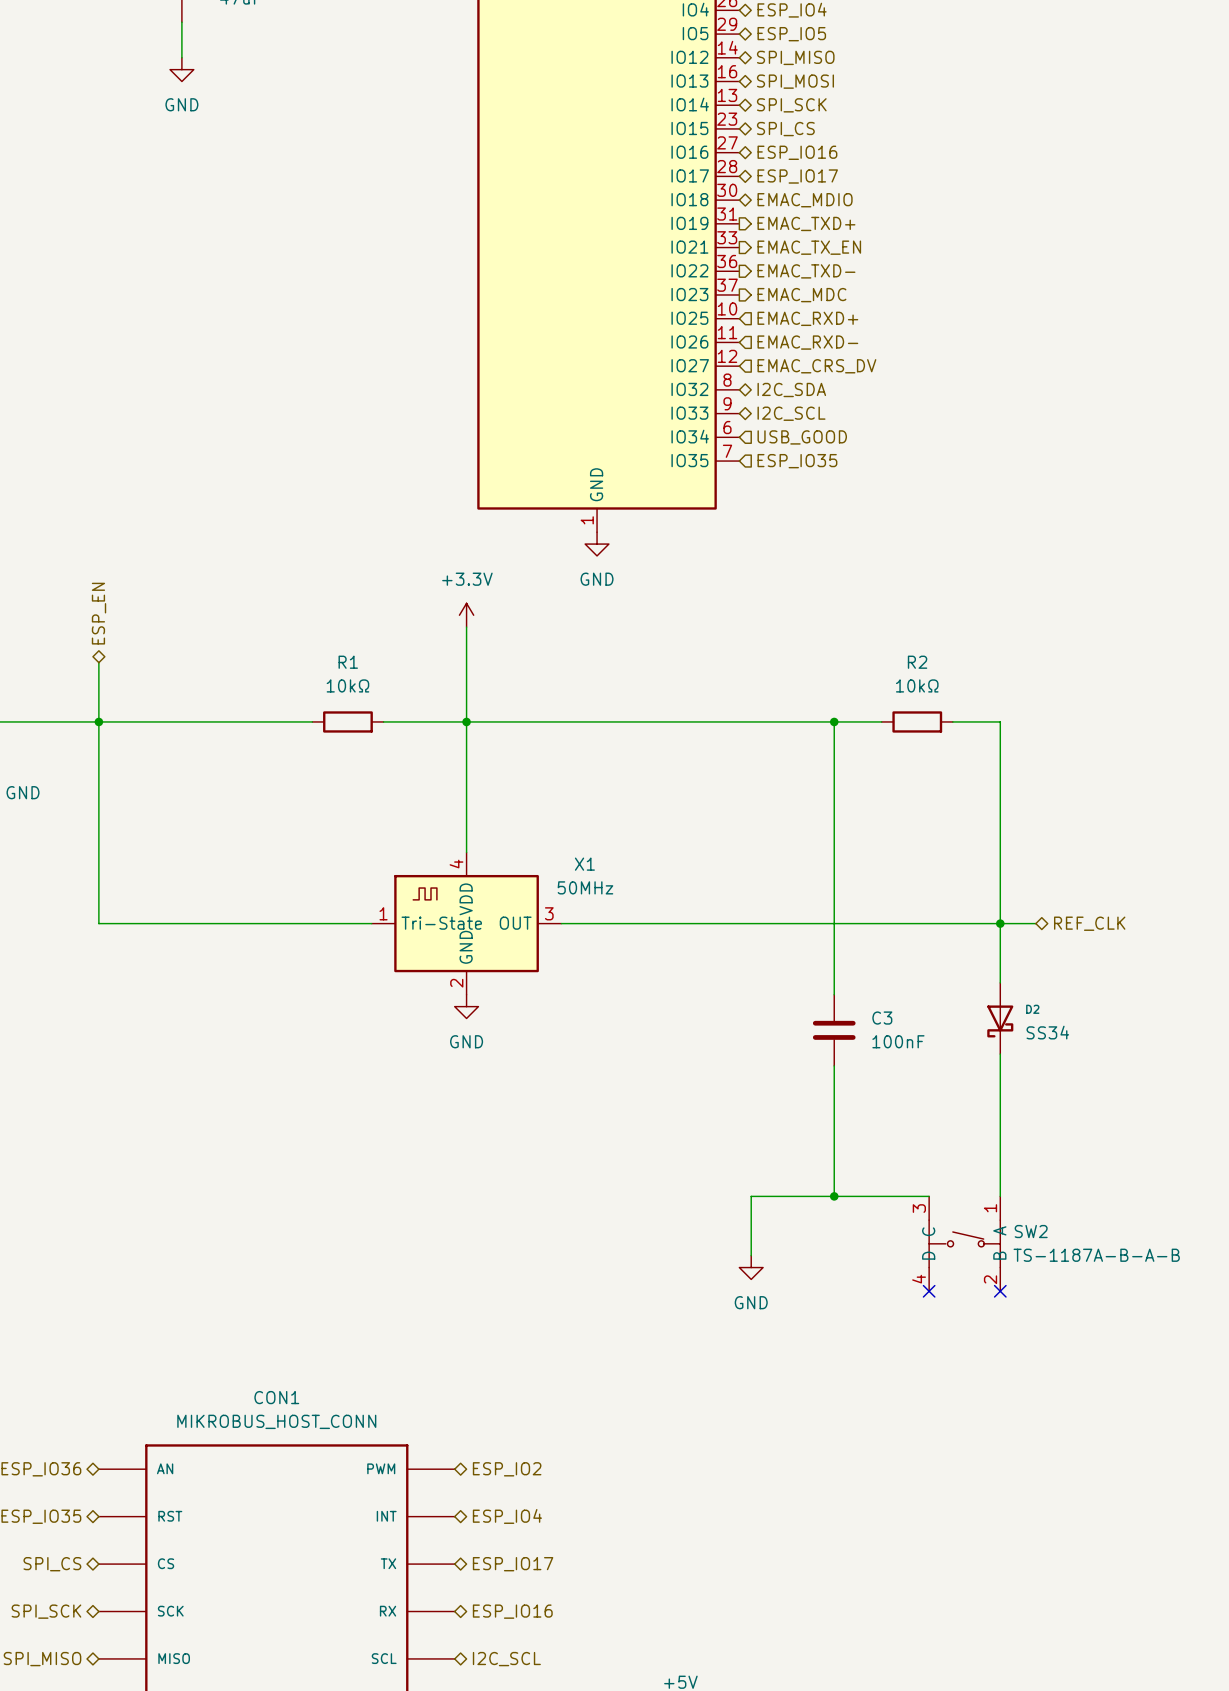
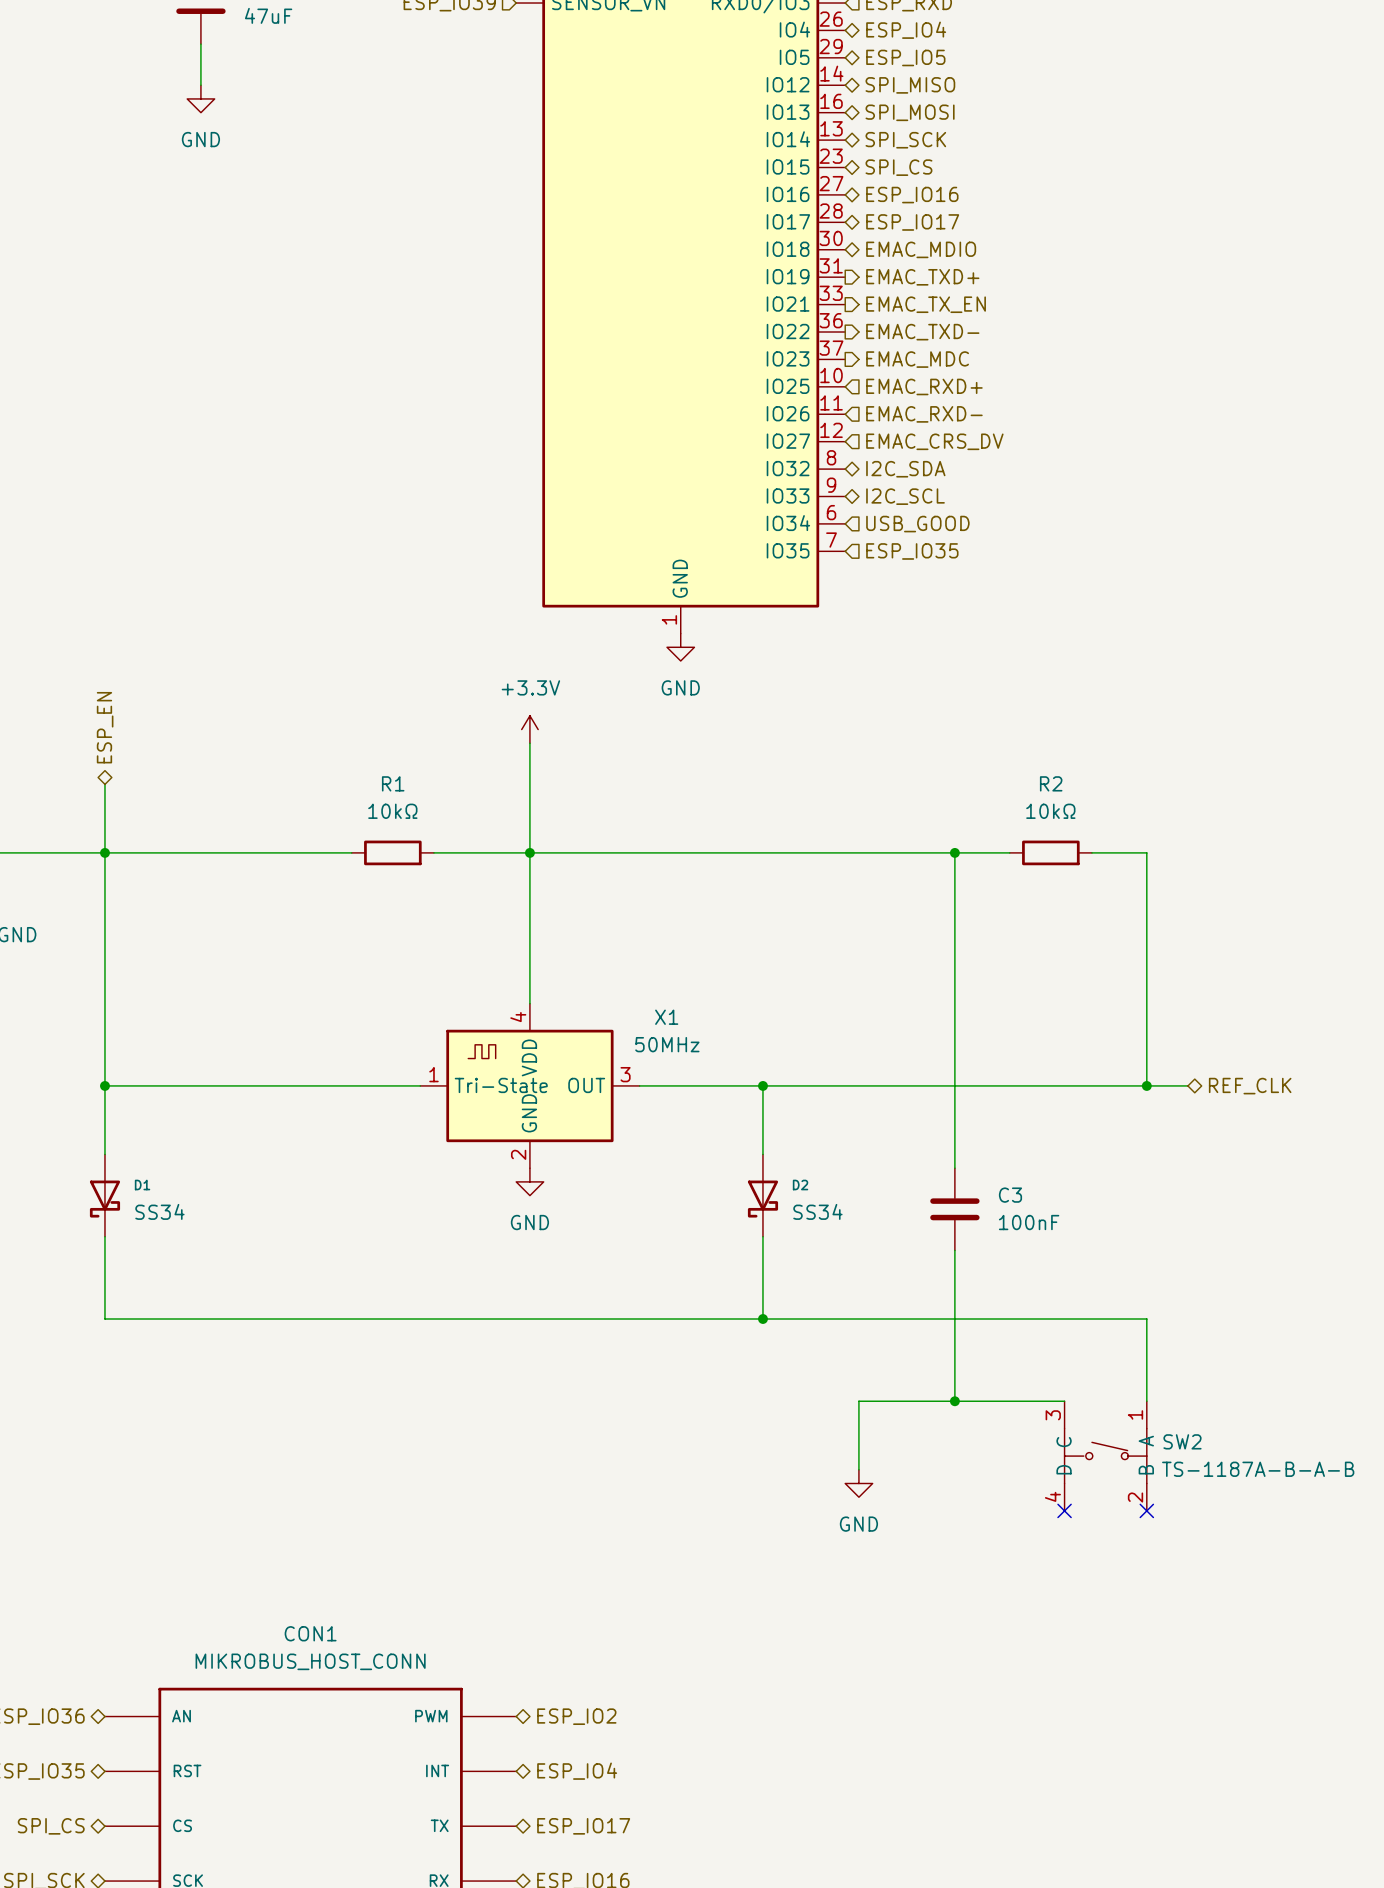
wire: none -> (104, 1085) (104, 1154)
junction: none -> (104, 1085)
wire: none -> (762, 1085) (762, 1154)
junction: none -> (762, 1085)
wire: (1000, 923) (1000, 982) -> none
D1: none -> SS34 (104, 1195)
D2 position: (1000, 1018) -> (762, 1195)
wire: none -> (762, 1236) (762, 1318)
wire: (1000, 1054) (1000, 1125) -> (104, 1236) (104, 1318) (1146, 1318)
junction: none -> (762, 1318)

